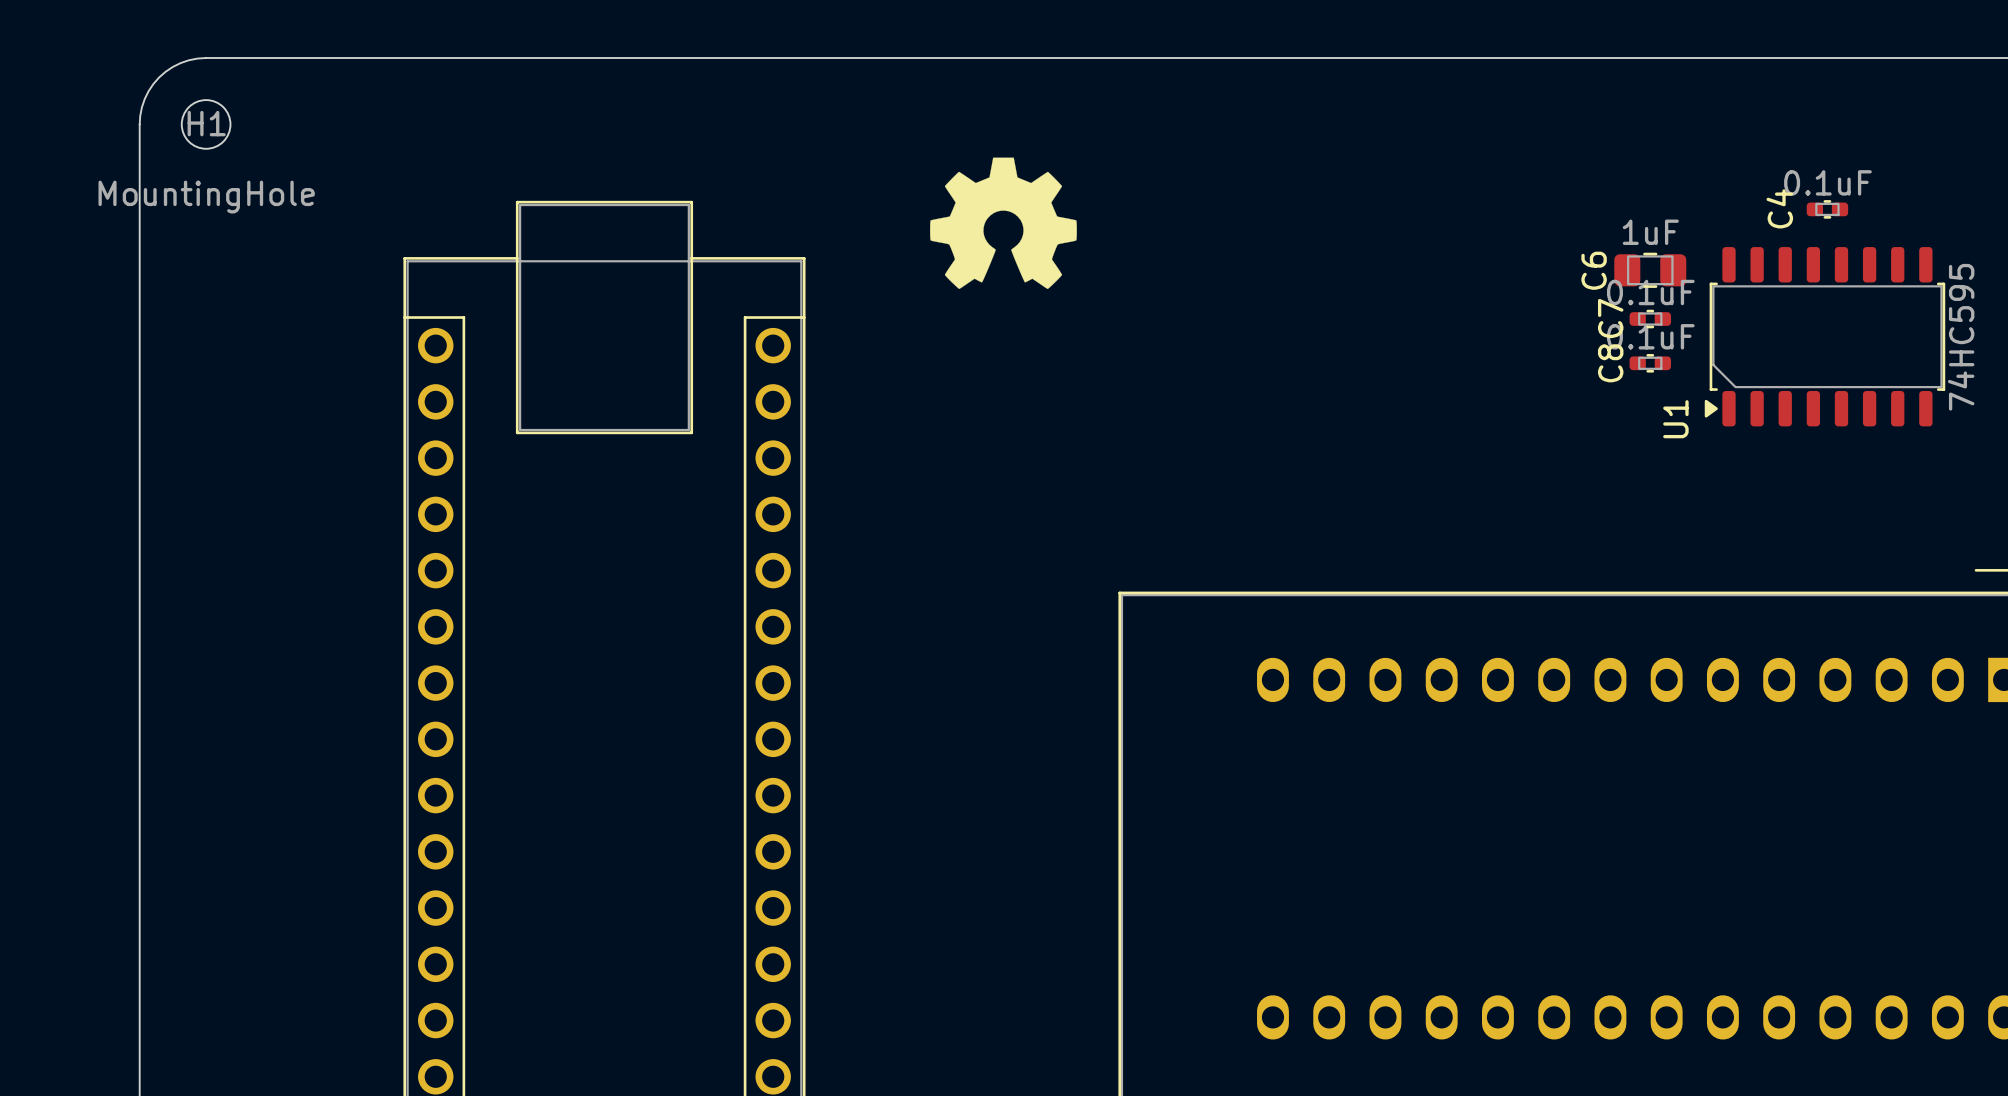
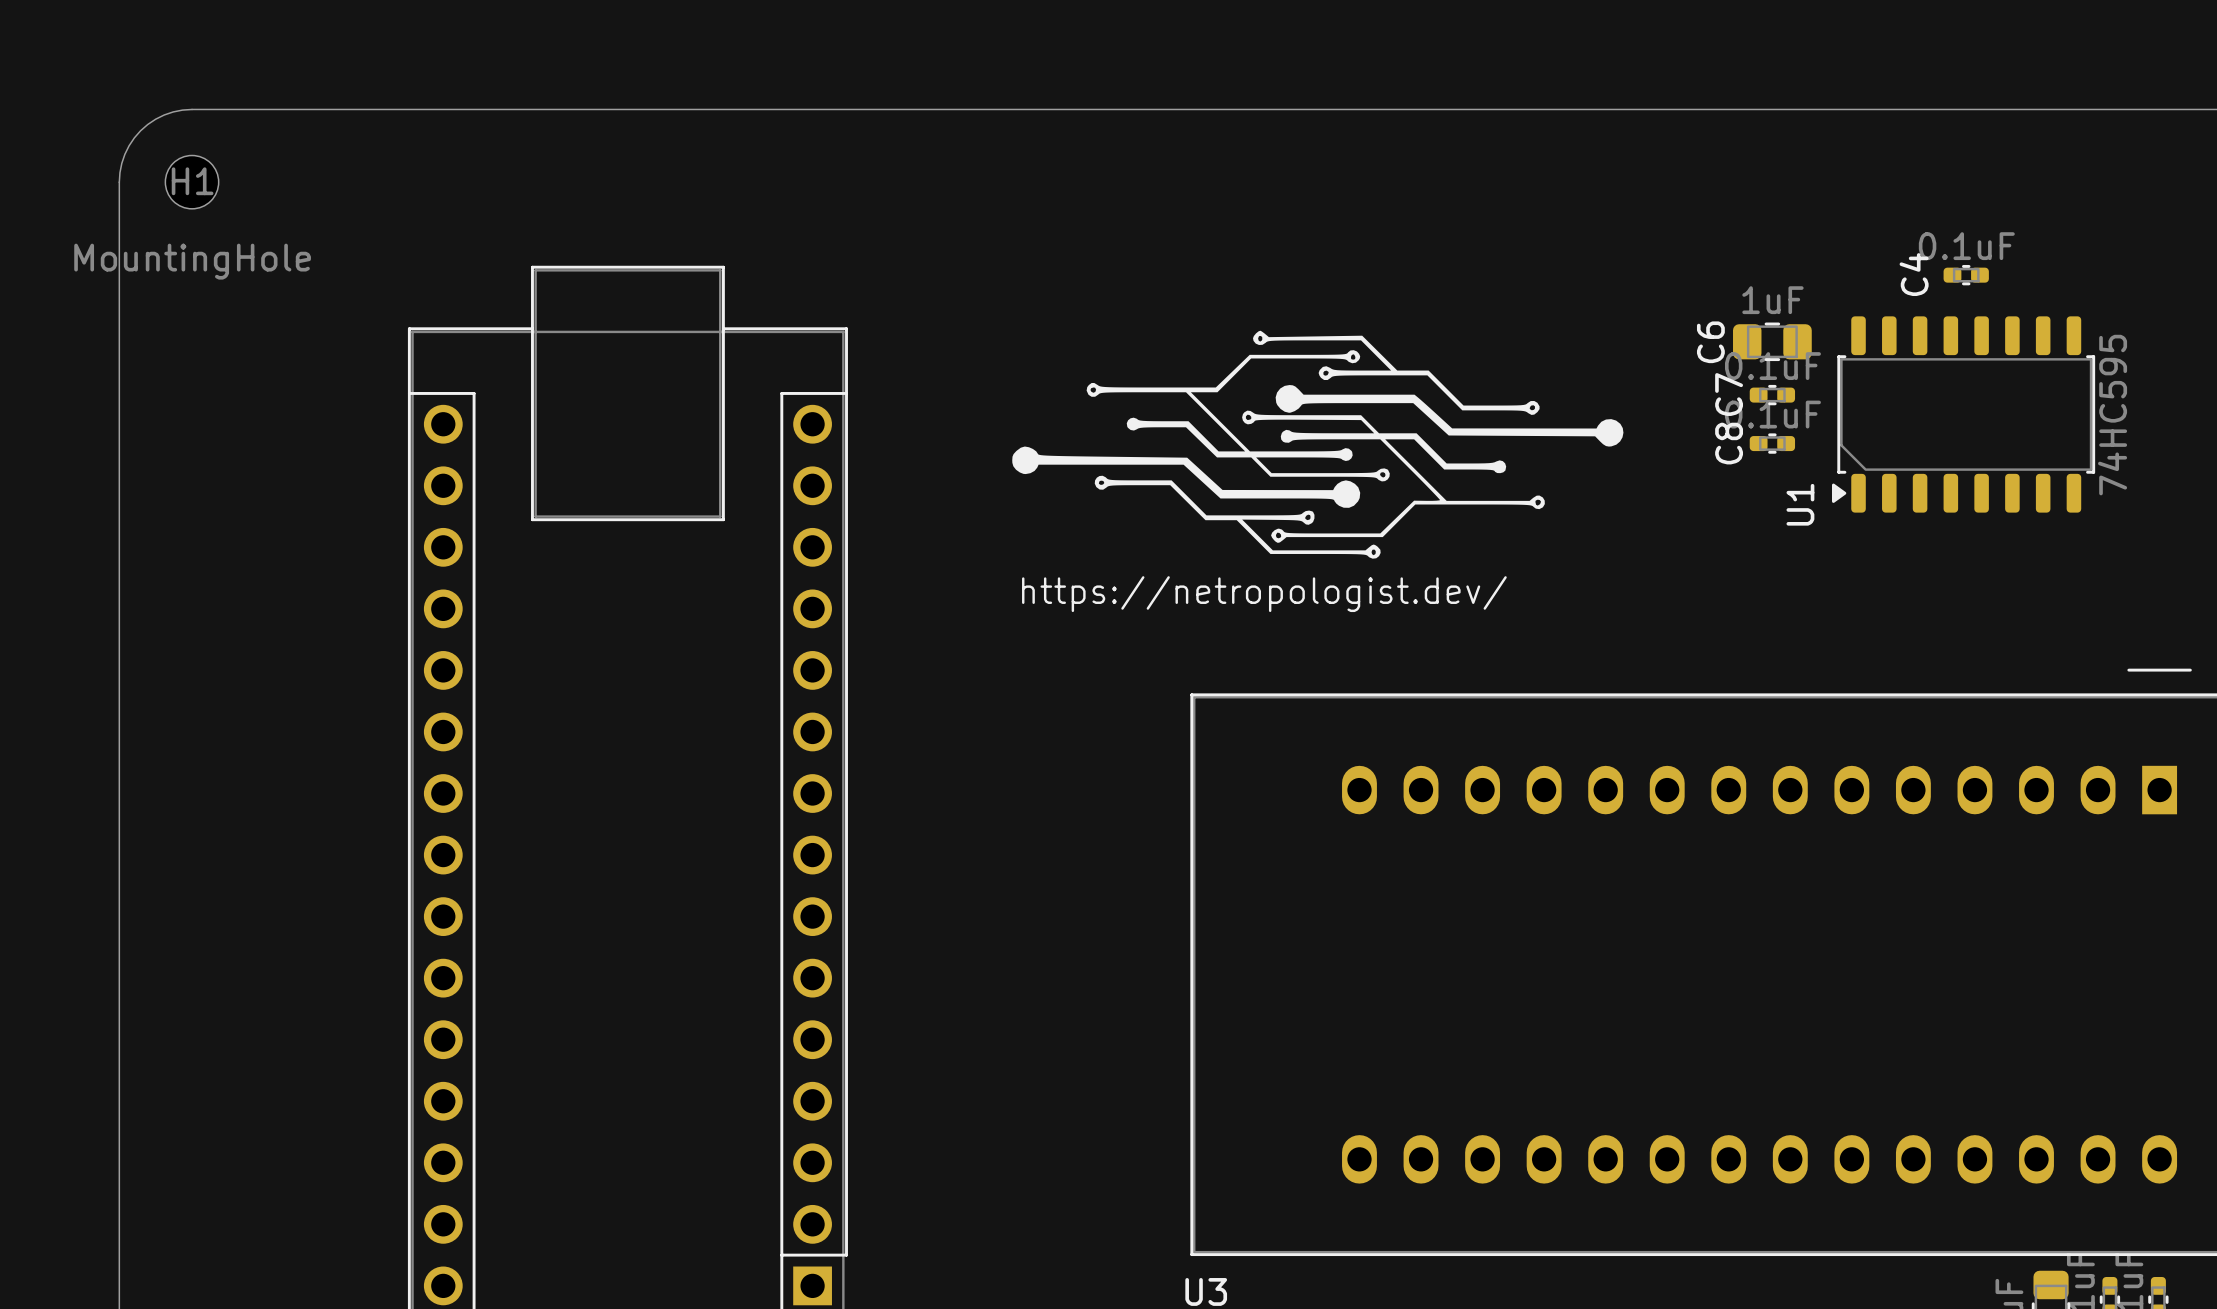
drawing: [930, 157, 1077, 290] -> none
drawing: none -> [1012, 330, 1624, 559]
text: none -> https://netropologist.dev/ (1264, 594)

